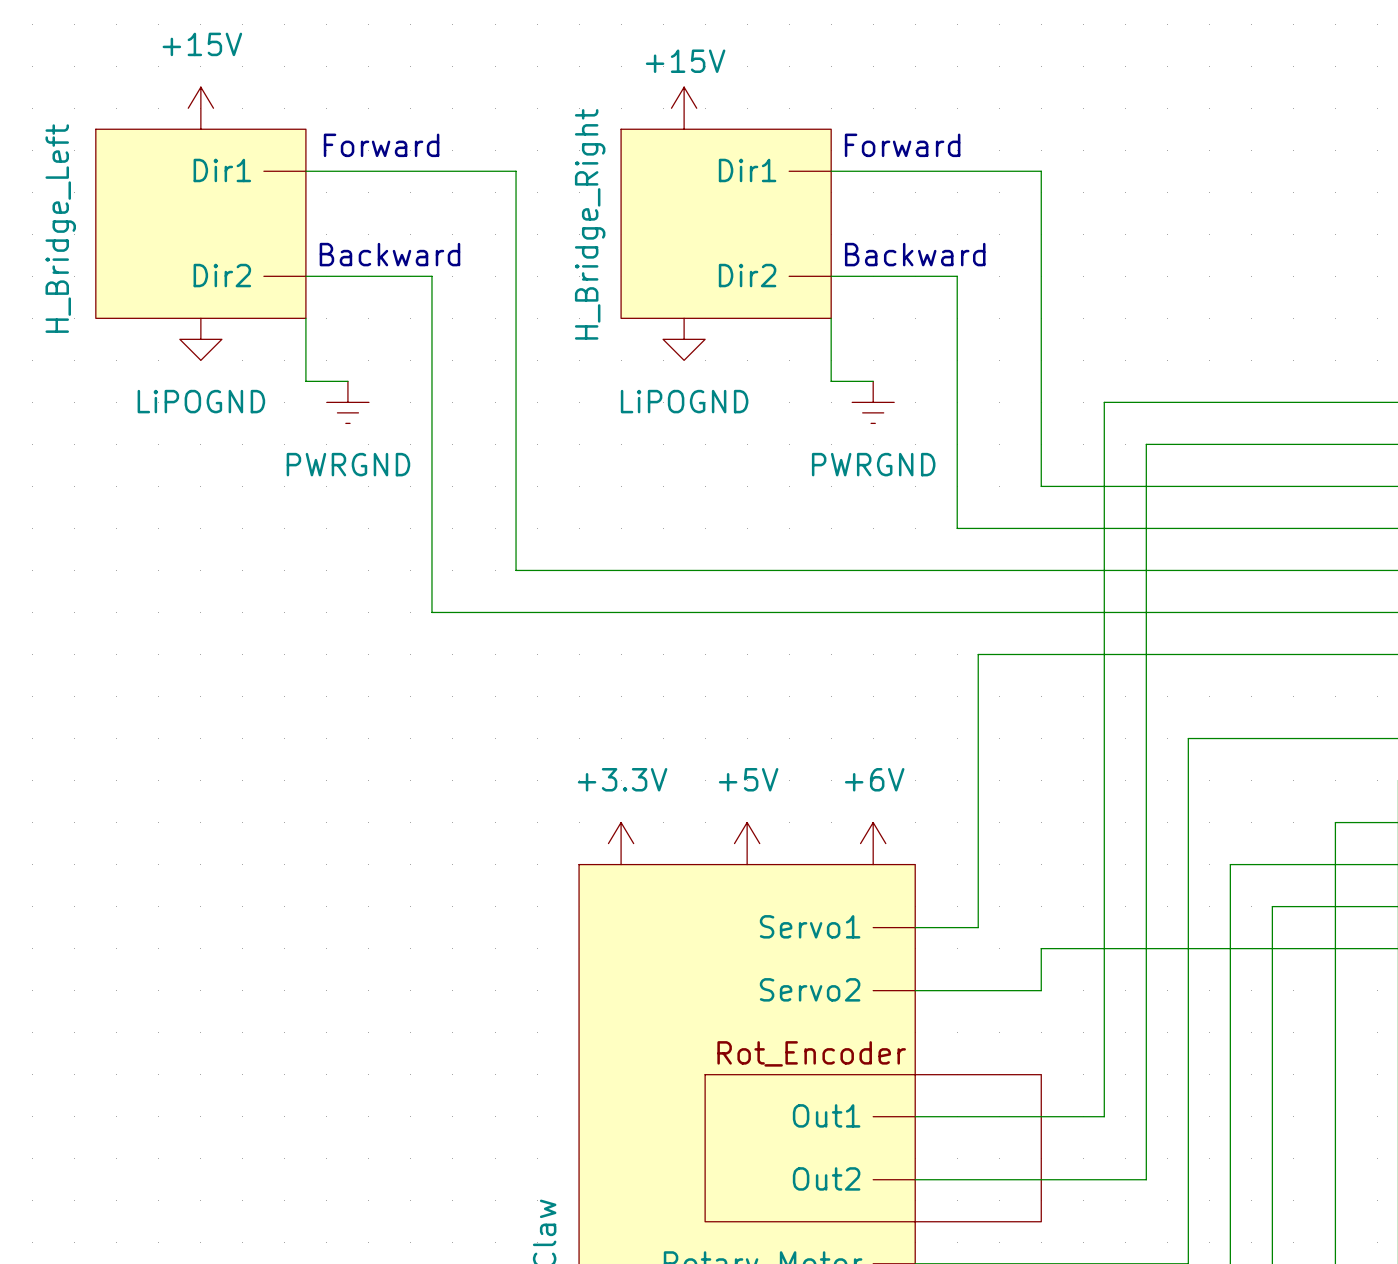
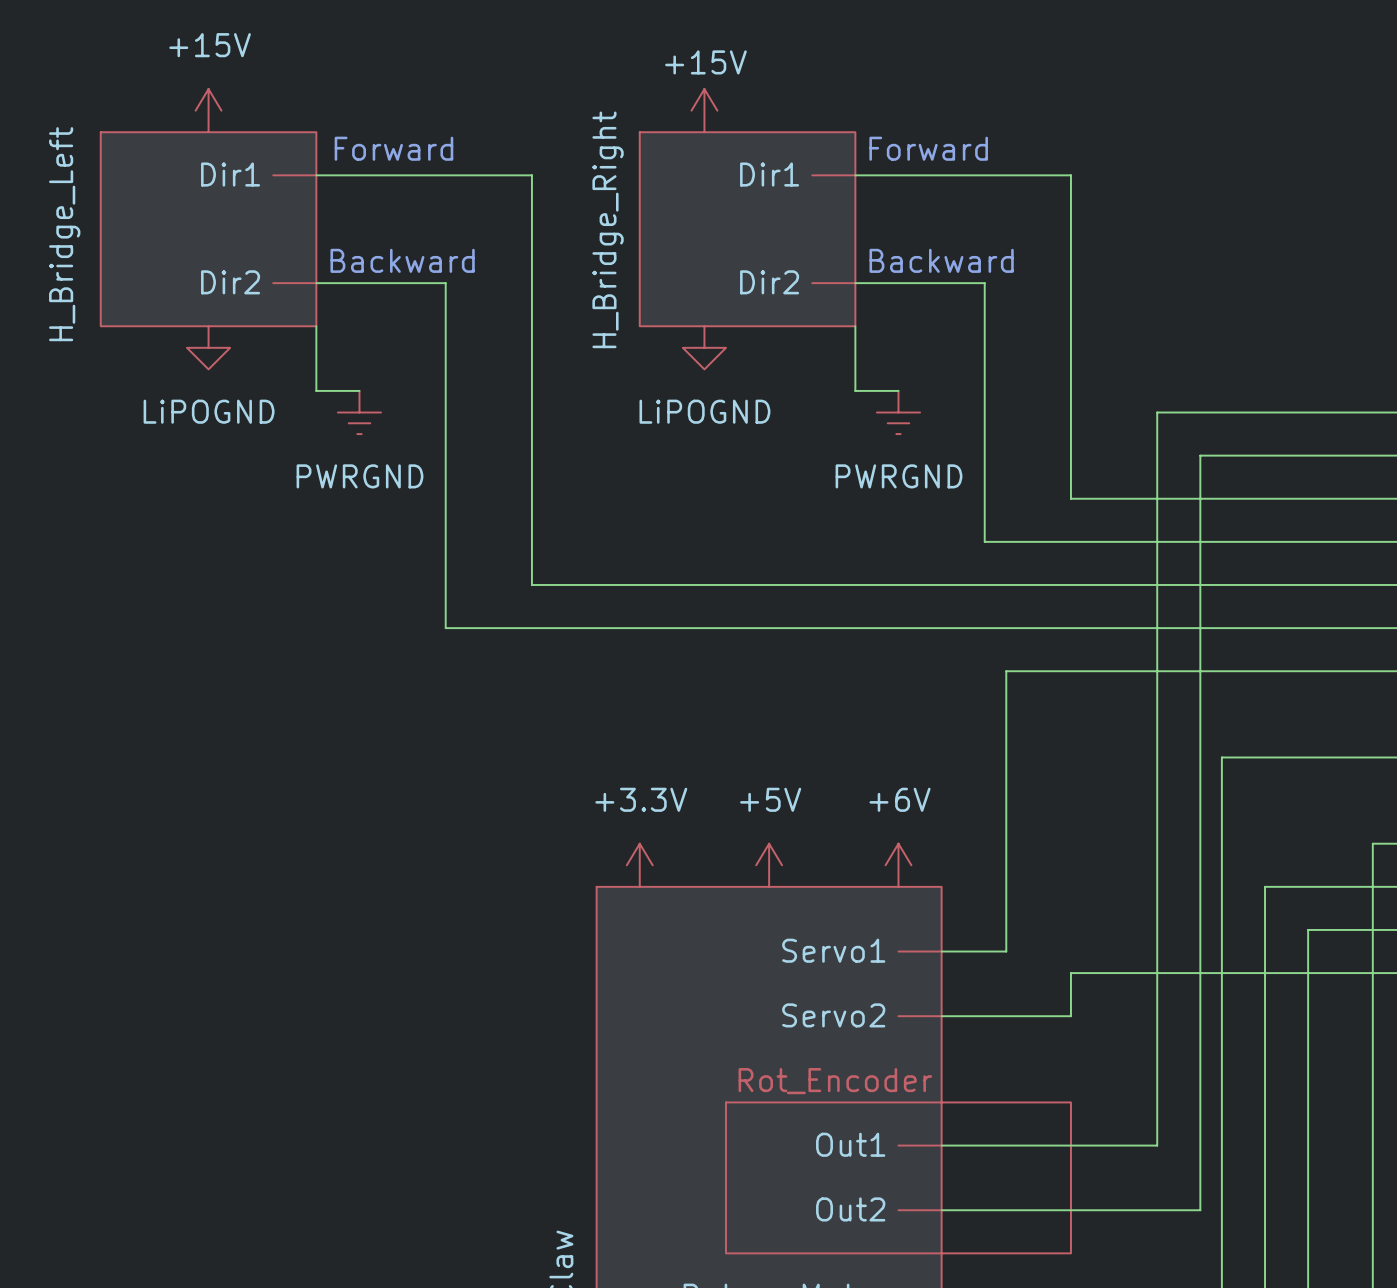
wire: (1125, 402) (1104, 402) (1104, 1116) -> (1157, 412) (1157, 1145) (1135, 1145)
wire: (1167, 444) (1146, 444) (1146, 1179) -> (1200, 455) (1200, 1210) (1178, 1210)

